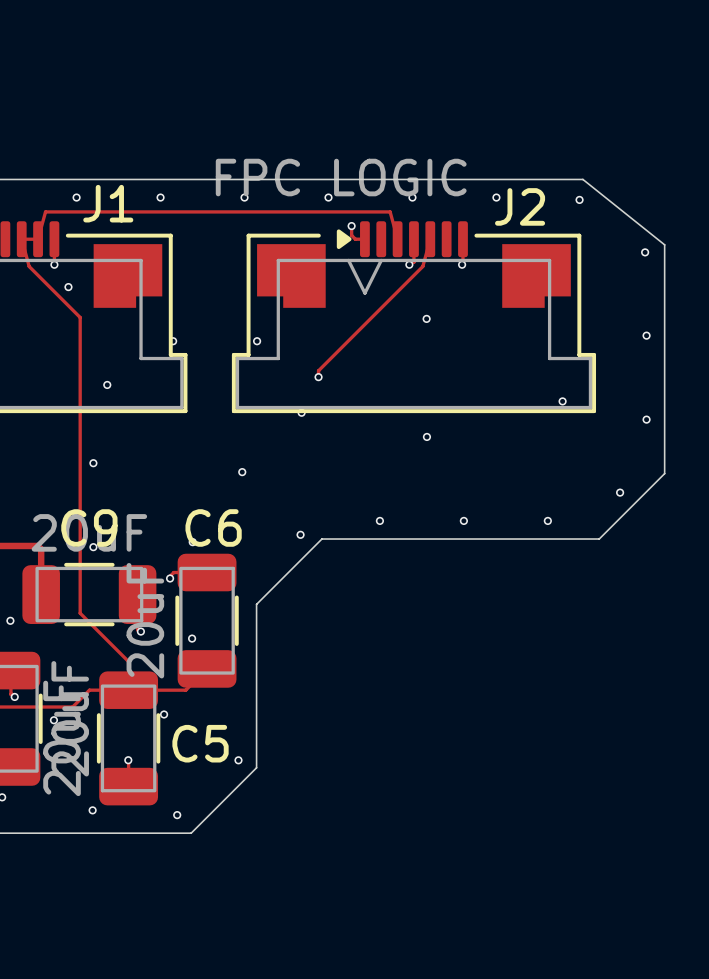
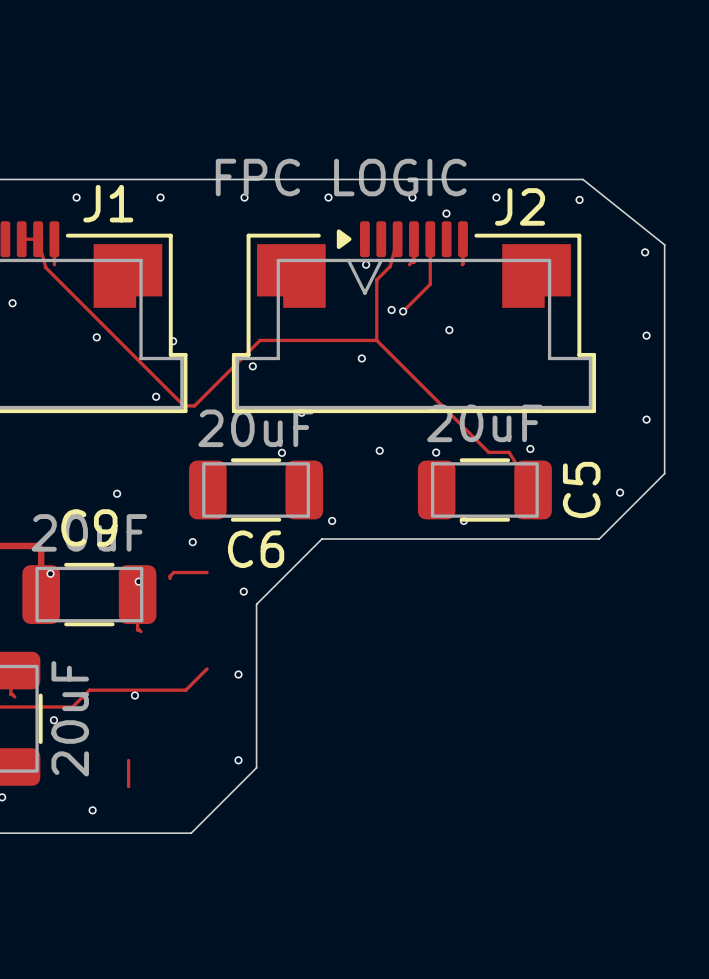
via: none -> (446, 213)
track: (351, 226) (351, 235) (355, 239) (364, 239) -> none
via: (351, 226) -> none
track: (21, 239) (29, 266) (80, 317) (80, 613) (128, 661) (128, 690) -> none
track: (38, 239) (45, 211) (390, 211) (397, 239) -> (38, 239) (45, 267) (183, 405) (194, 405) (260, 340) (376, 340)
track: none -> (397, 239) (390, 266) (376, 279) (376, 340)
track: (430, 239) (422, 266) (318, 370) (318, 377) -> (430, 239) (430, 284) (403, 311)
via: (54, 264) -> none
via: none -> (366, 264)
via: (409, 264) -> none
via: (462, 264) -> none
via: (68, 287) -> none
via: none -> (12, 303)
via: none -> (391, 310)
via: none -> (403, 311)
via: (426, 318) -> none
via: none -> (449, 330)
via: none -> (96, 337)
track: none -> (376, 340) (488, 452) (509, 452) (533, 489)
via position: (257, 341) -> (252, 366)
via: none -> (361, 358)
via: (318, 377) -> none
via: (107, 384) -> none
via: none -> (156, 396)
via: (562, 401) -> none
via position: (426, 436) -> (436, 452)
via: none -> (530, 449)
via: none -> (379, 450)
via: none -> (281, 452)
via: (93, 463) -> none
via: (242, 472) -> none
via: none -> (117, 493)
via: none -> (332, 520)
via: (379, 520) -> none
via: (547, 520) -> none
C6 name position: C6 (213, 527) -> C6 (256, 549)
via: (300, 534) -> none
via: (93, 547) -> none
via: none -> (50, 573)
via: (170, 578) -> none
via: none -> (138, 581)
via: none -> (243, 591)
via: (10, 620) -> none
C6 rotation: 0° (207, 620) -> 90° clockwise (256, 489)
C6 position: (207, 620) -> (256, 489)
via: (140, 631) -> none
via: (192, 638) -> none
via: none -> (238, 674)
via: none -> (134, 695)
via: (14, 696) -> none
via: (164, 714) -> none
C5 rotation: 0° (128, 738) -> 90° clockwise (484, 489)
C5 position: (128, 738) -> (484, 489)
via: (128, 760) -> none
via: (177, 815) -> none

